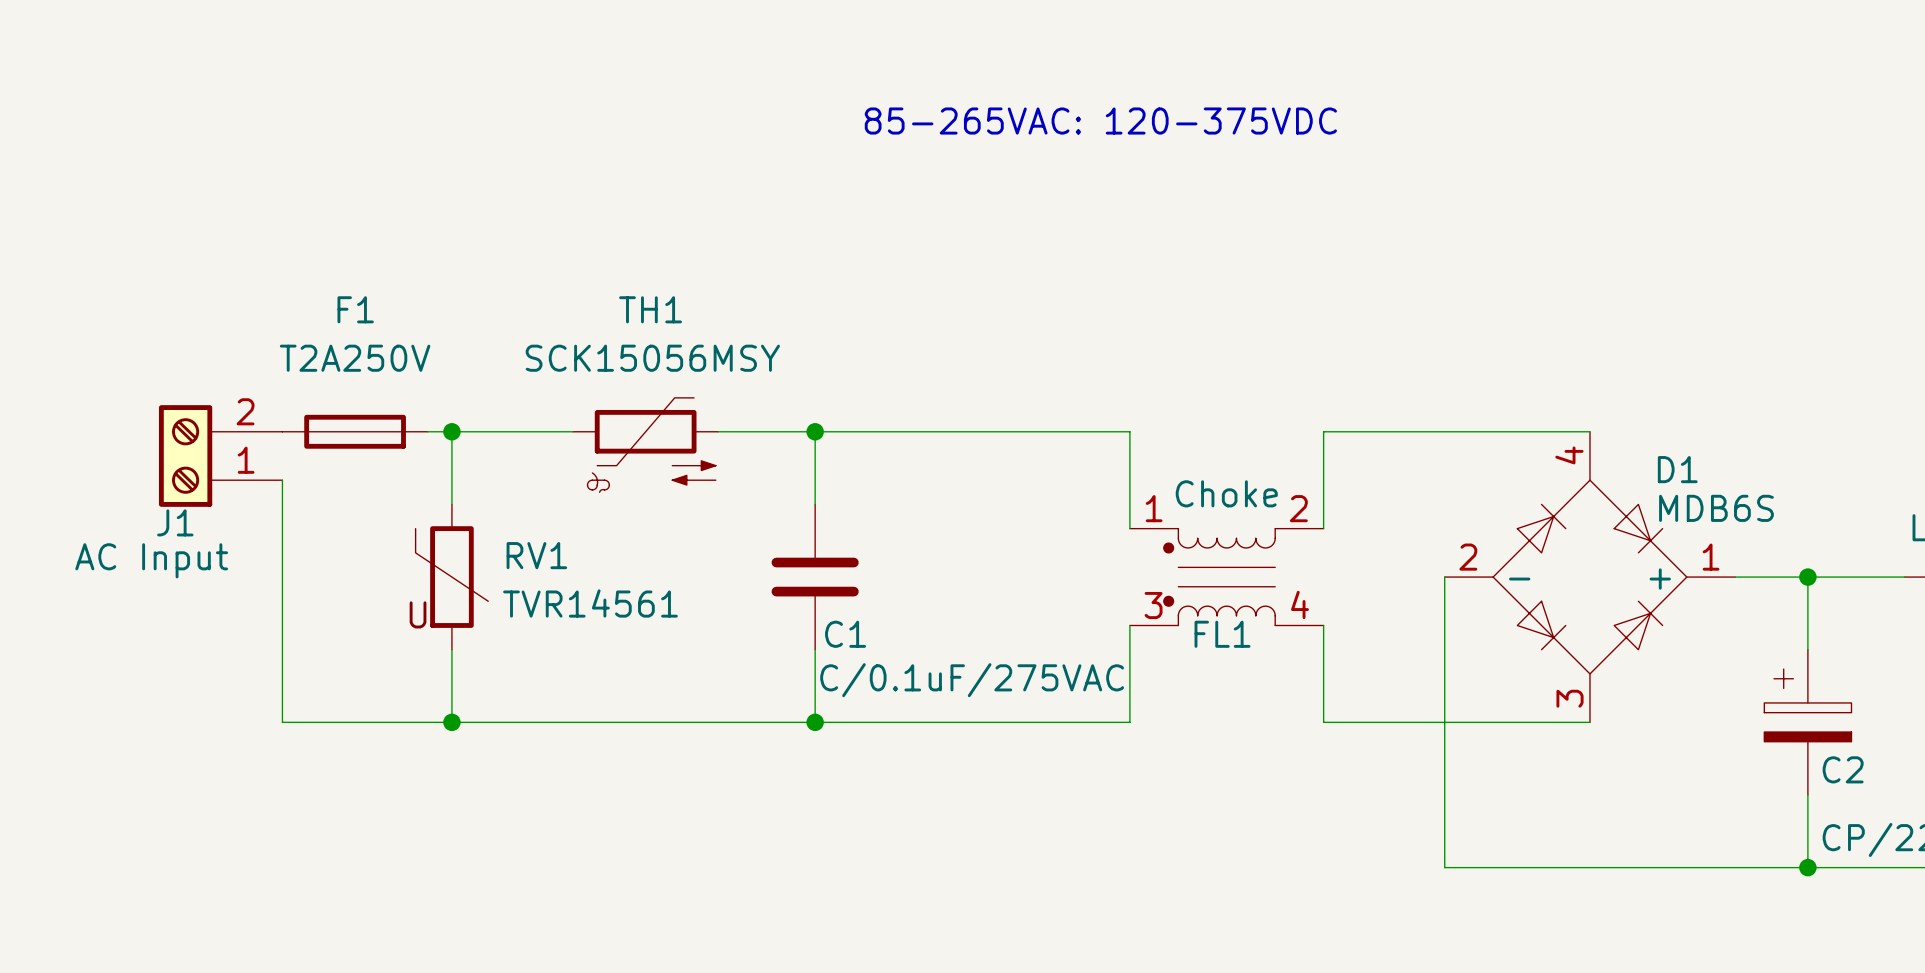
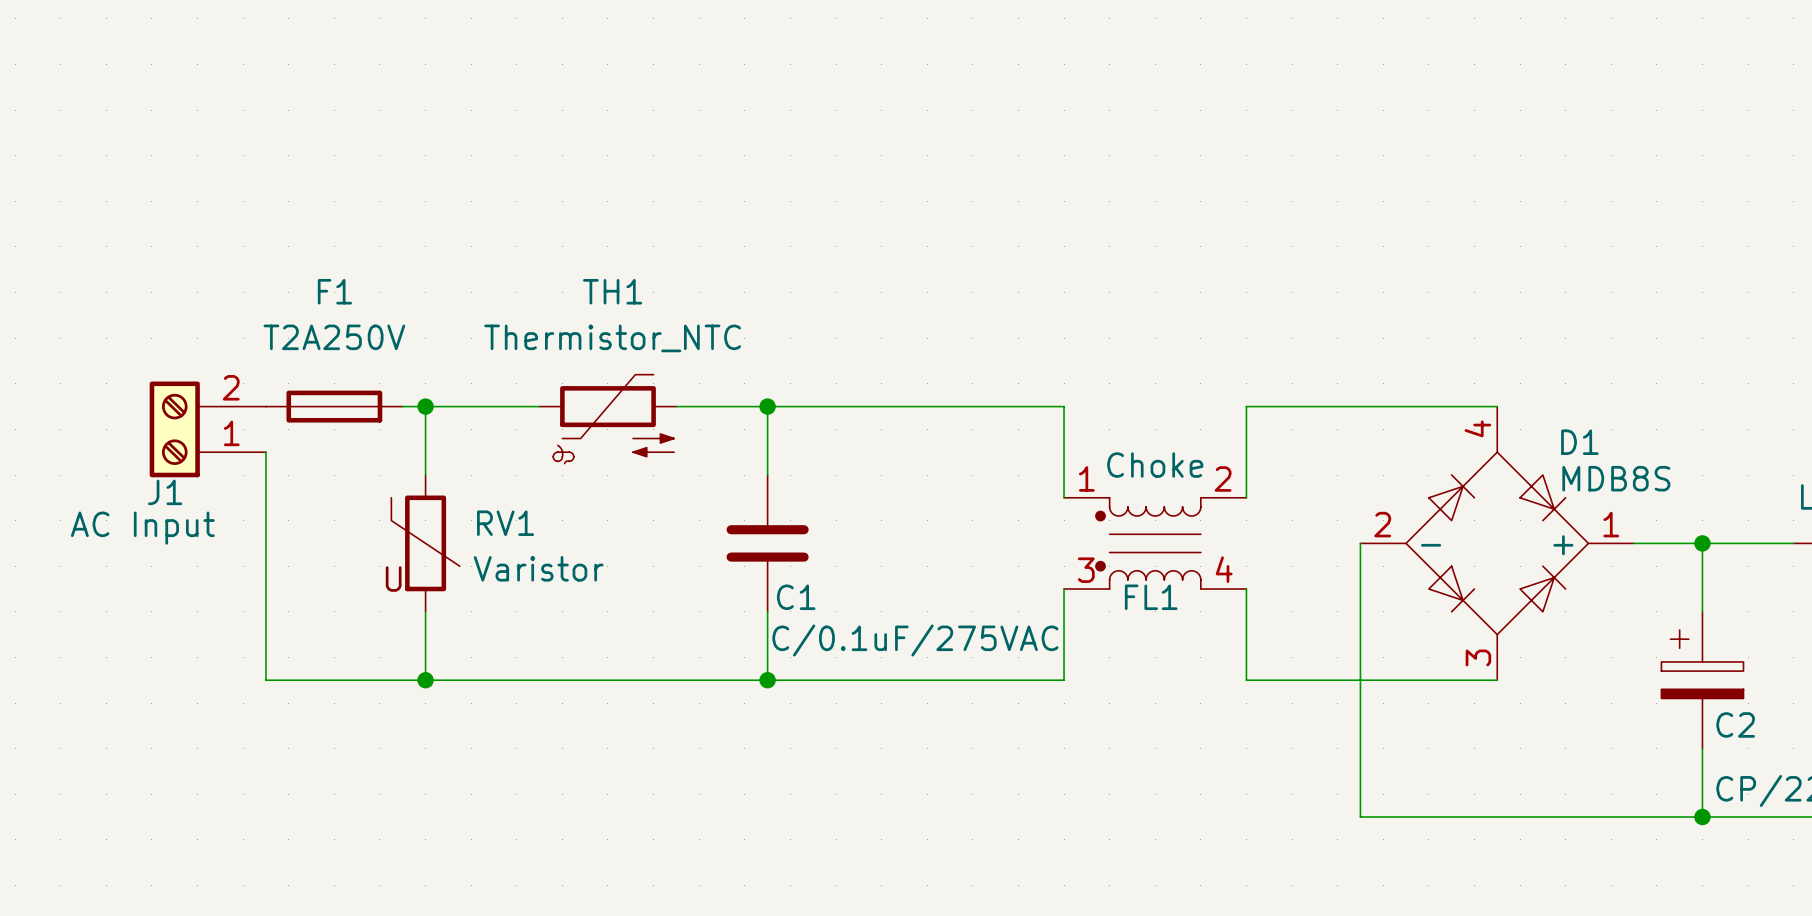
text: 85-265VAC: 120-375VDC (1100, 121) -> none
TH1 value: SCK15056MSY (652, 358) -> Thermistor_NTC (612, 338)
D1 value: MDB6S (1716, 508) -> MDB8S (1616, 478)
RV1 value: TVR14561 (590, 603) -> Varistor (538, 568)

